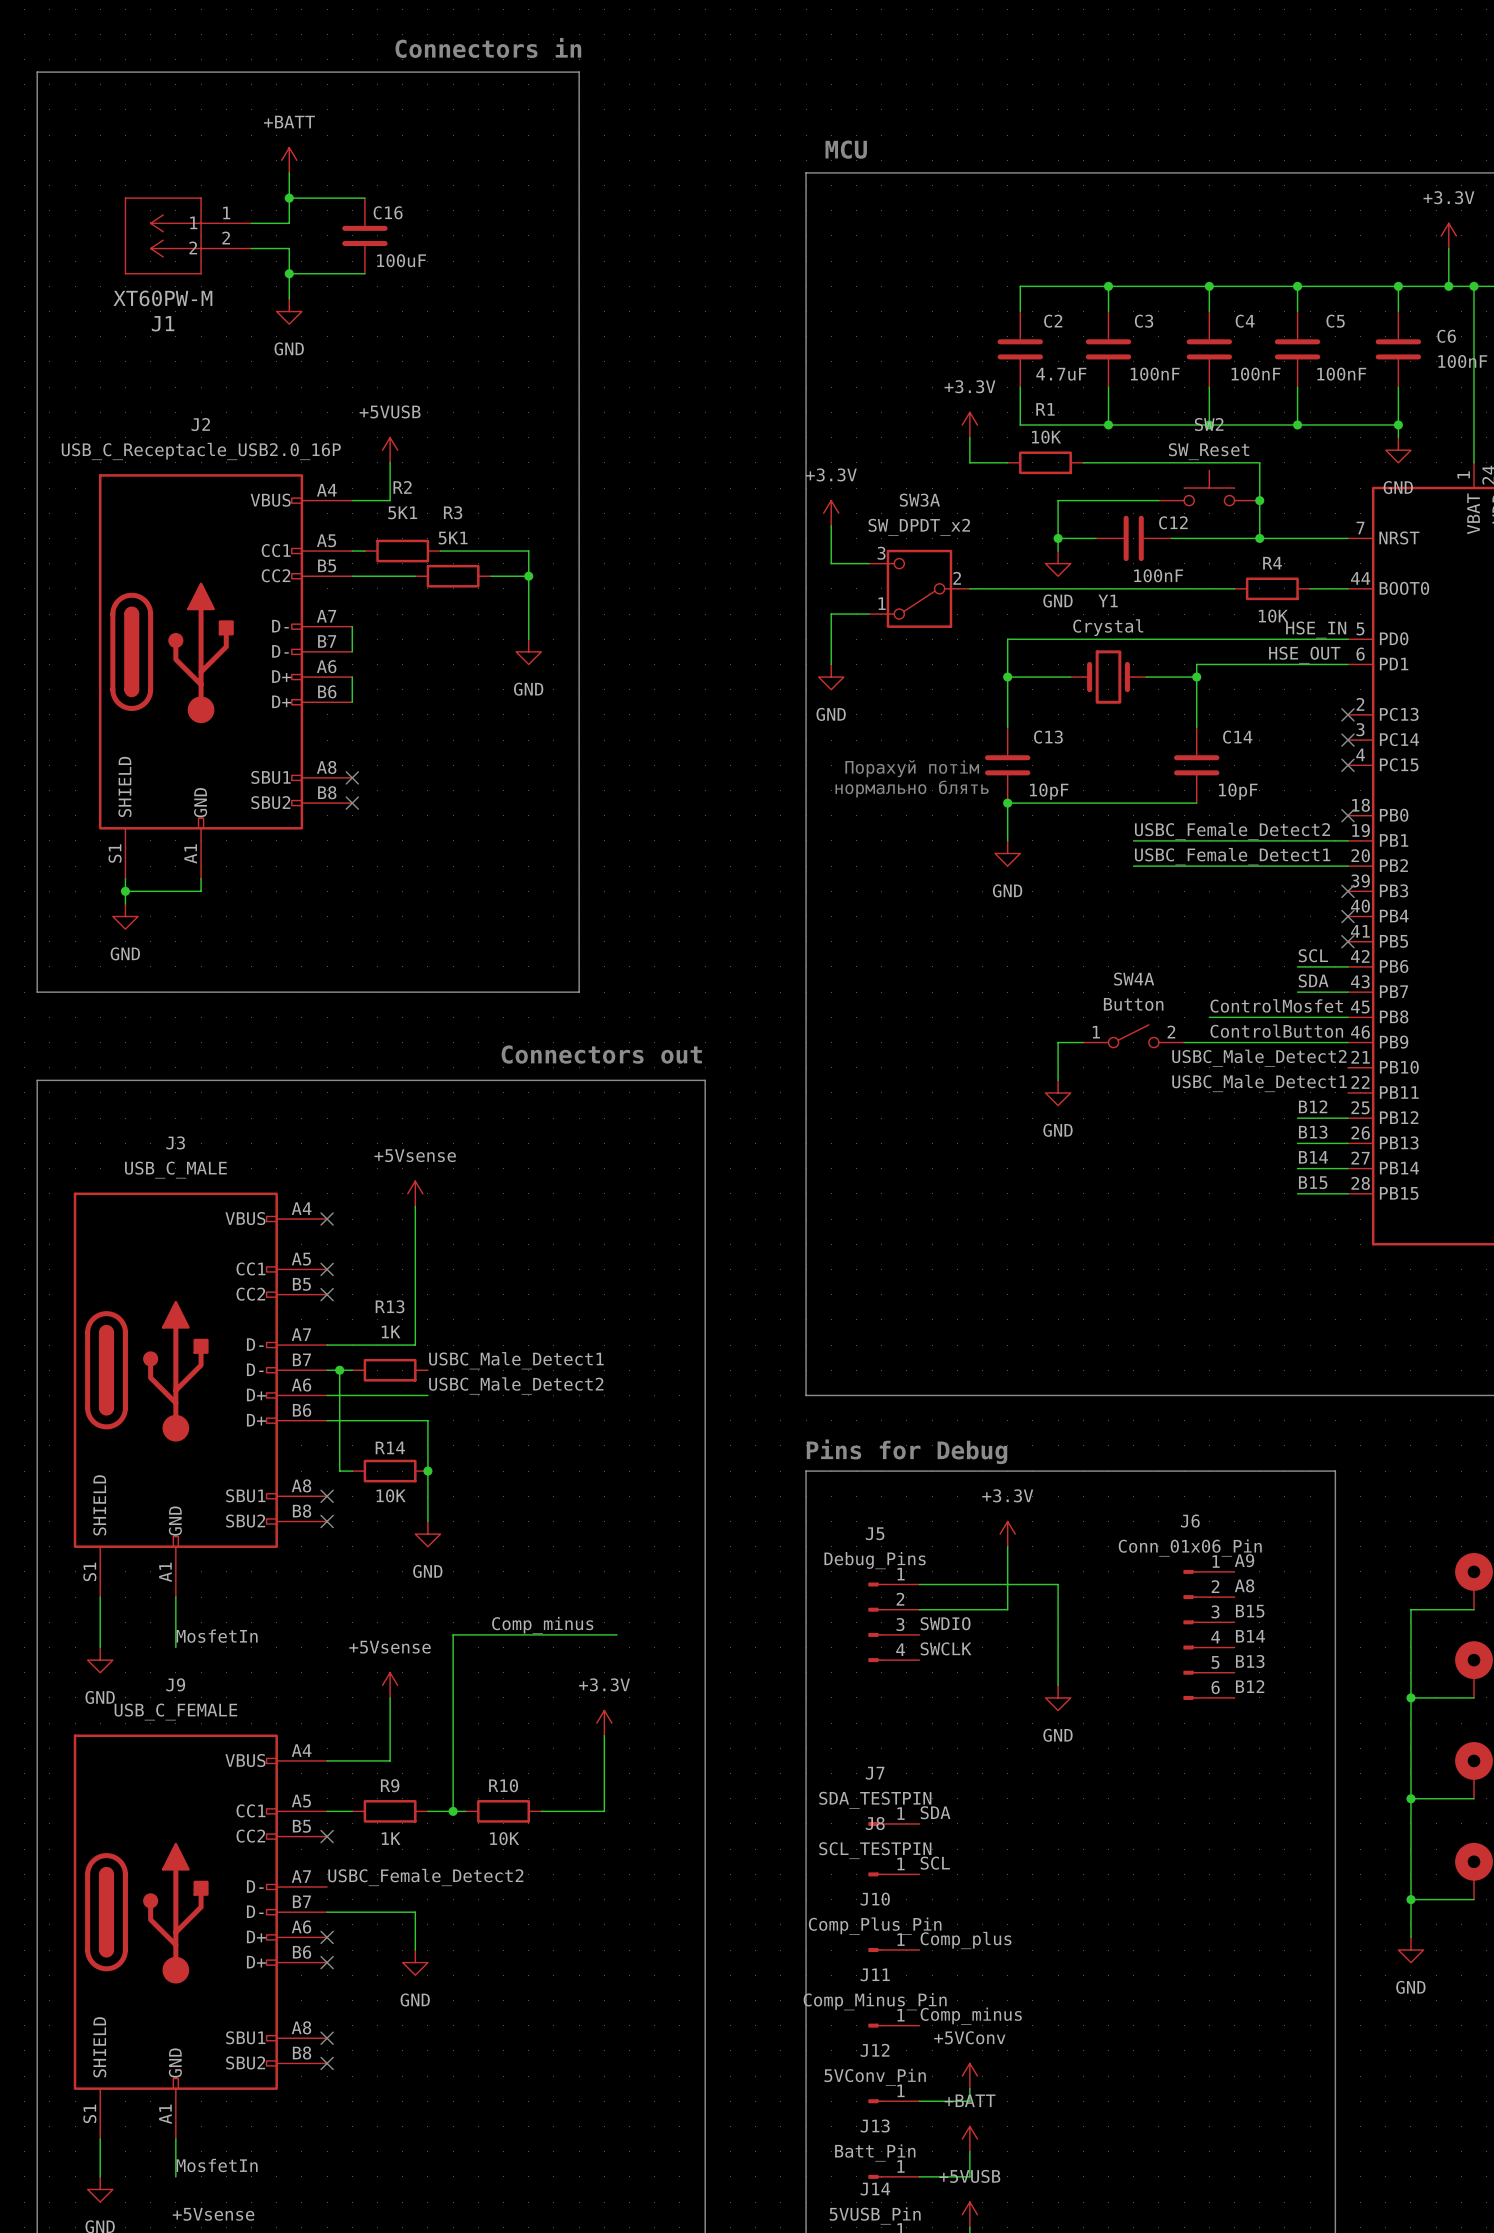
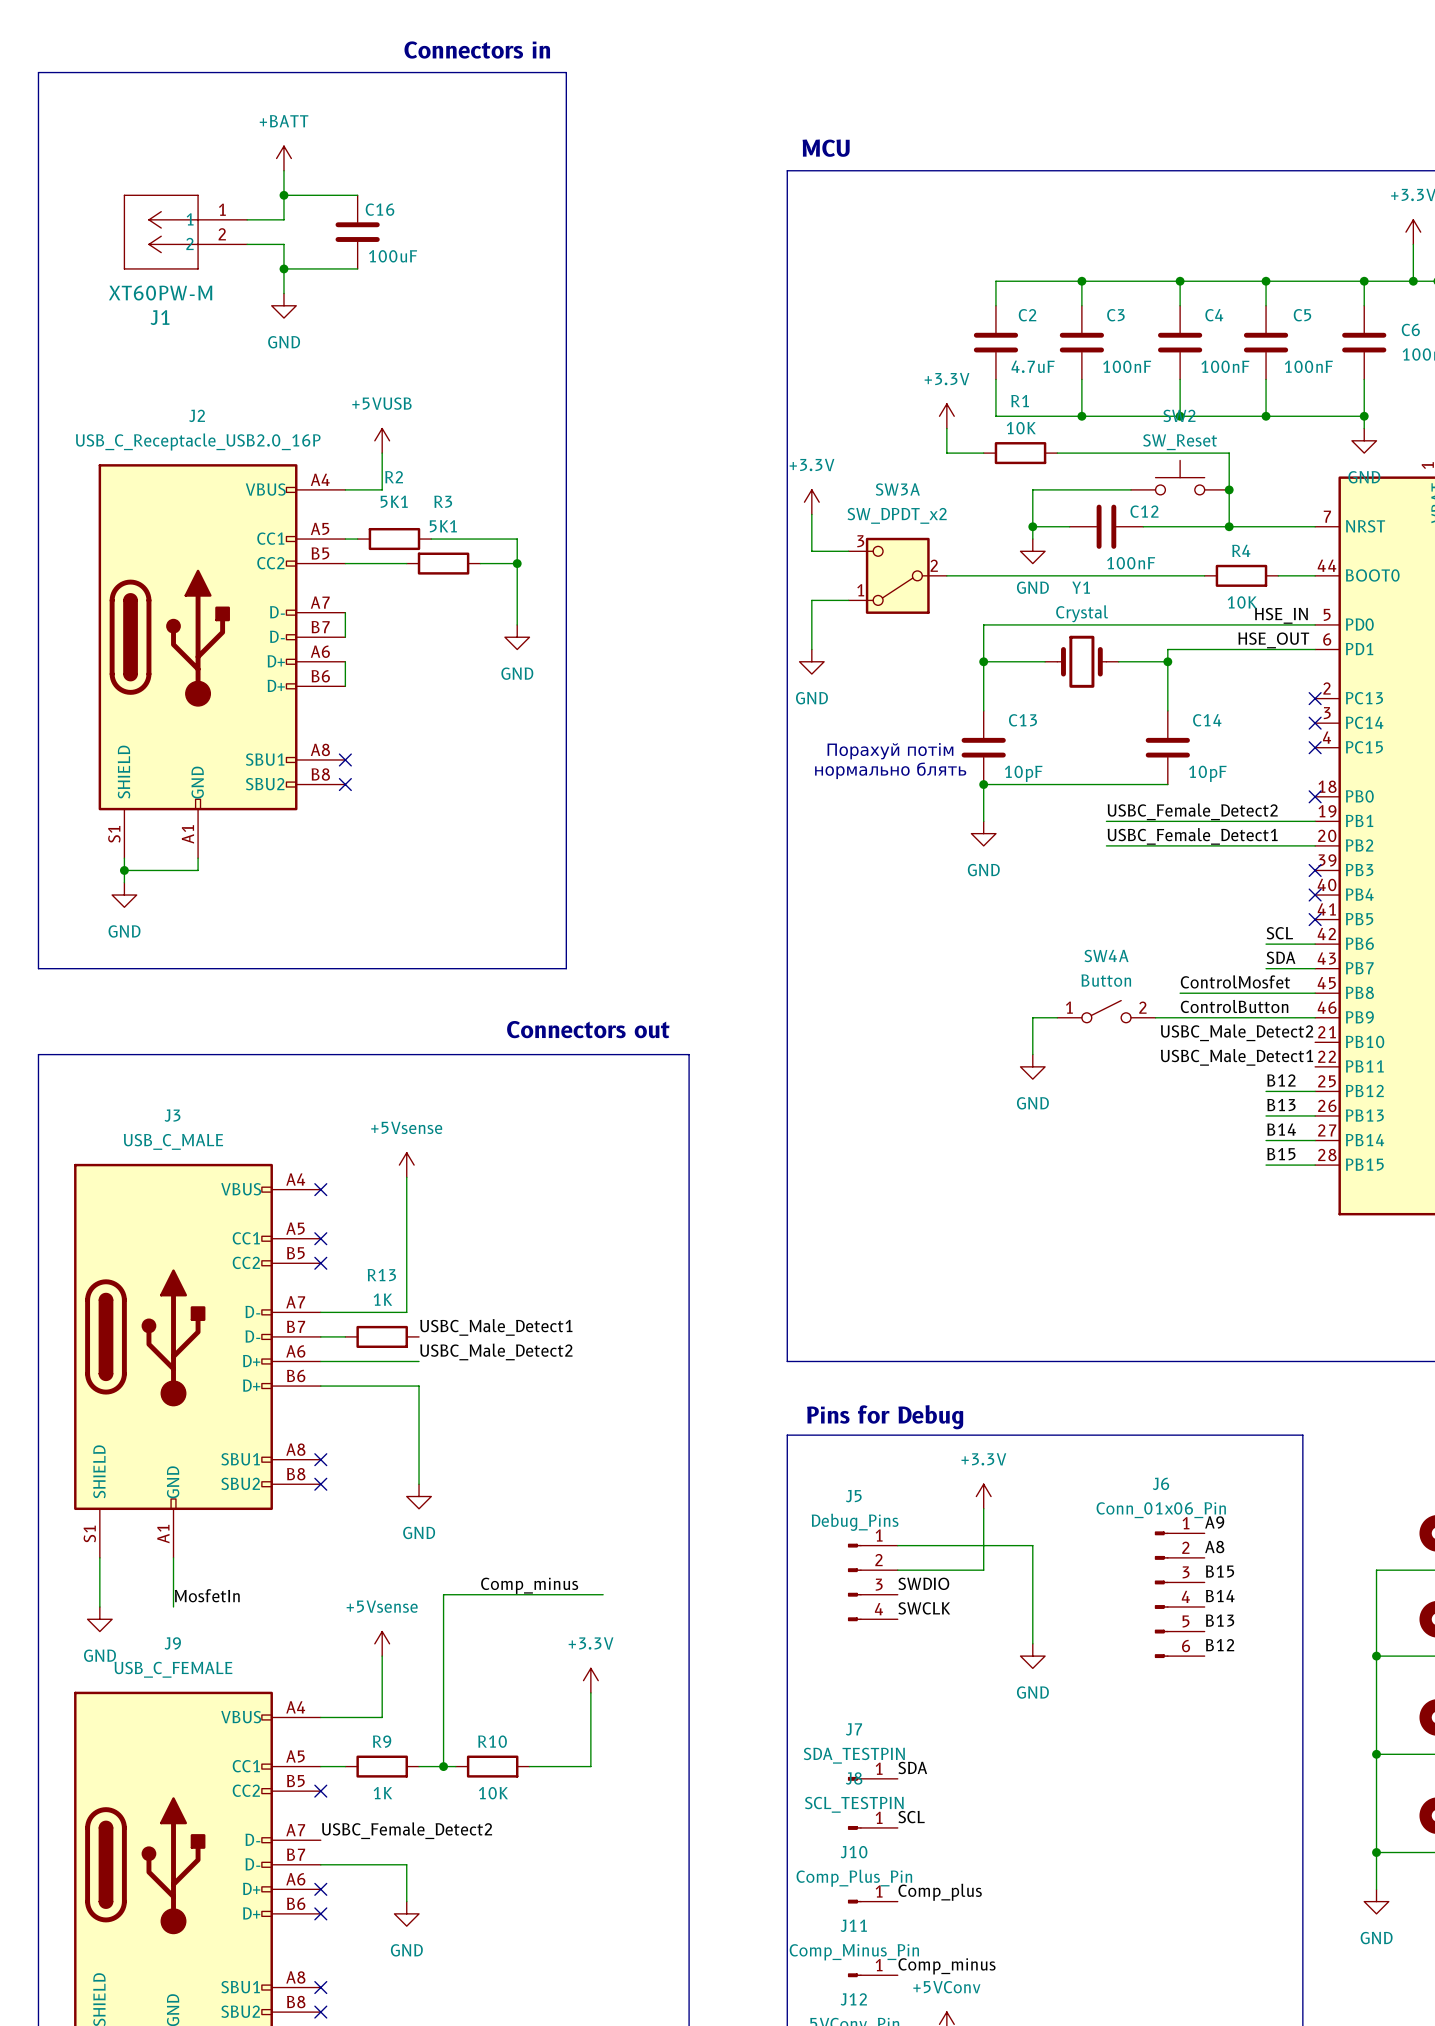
wire: (339, 1370) (339, 1471) (352, 1471) -> none
junction: (339, 1370) -> none
R14: 10K (390, 1471) -> none
junction: (427, 1471) -> none

